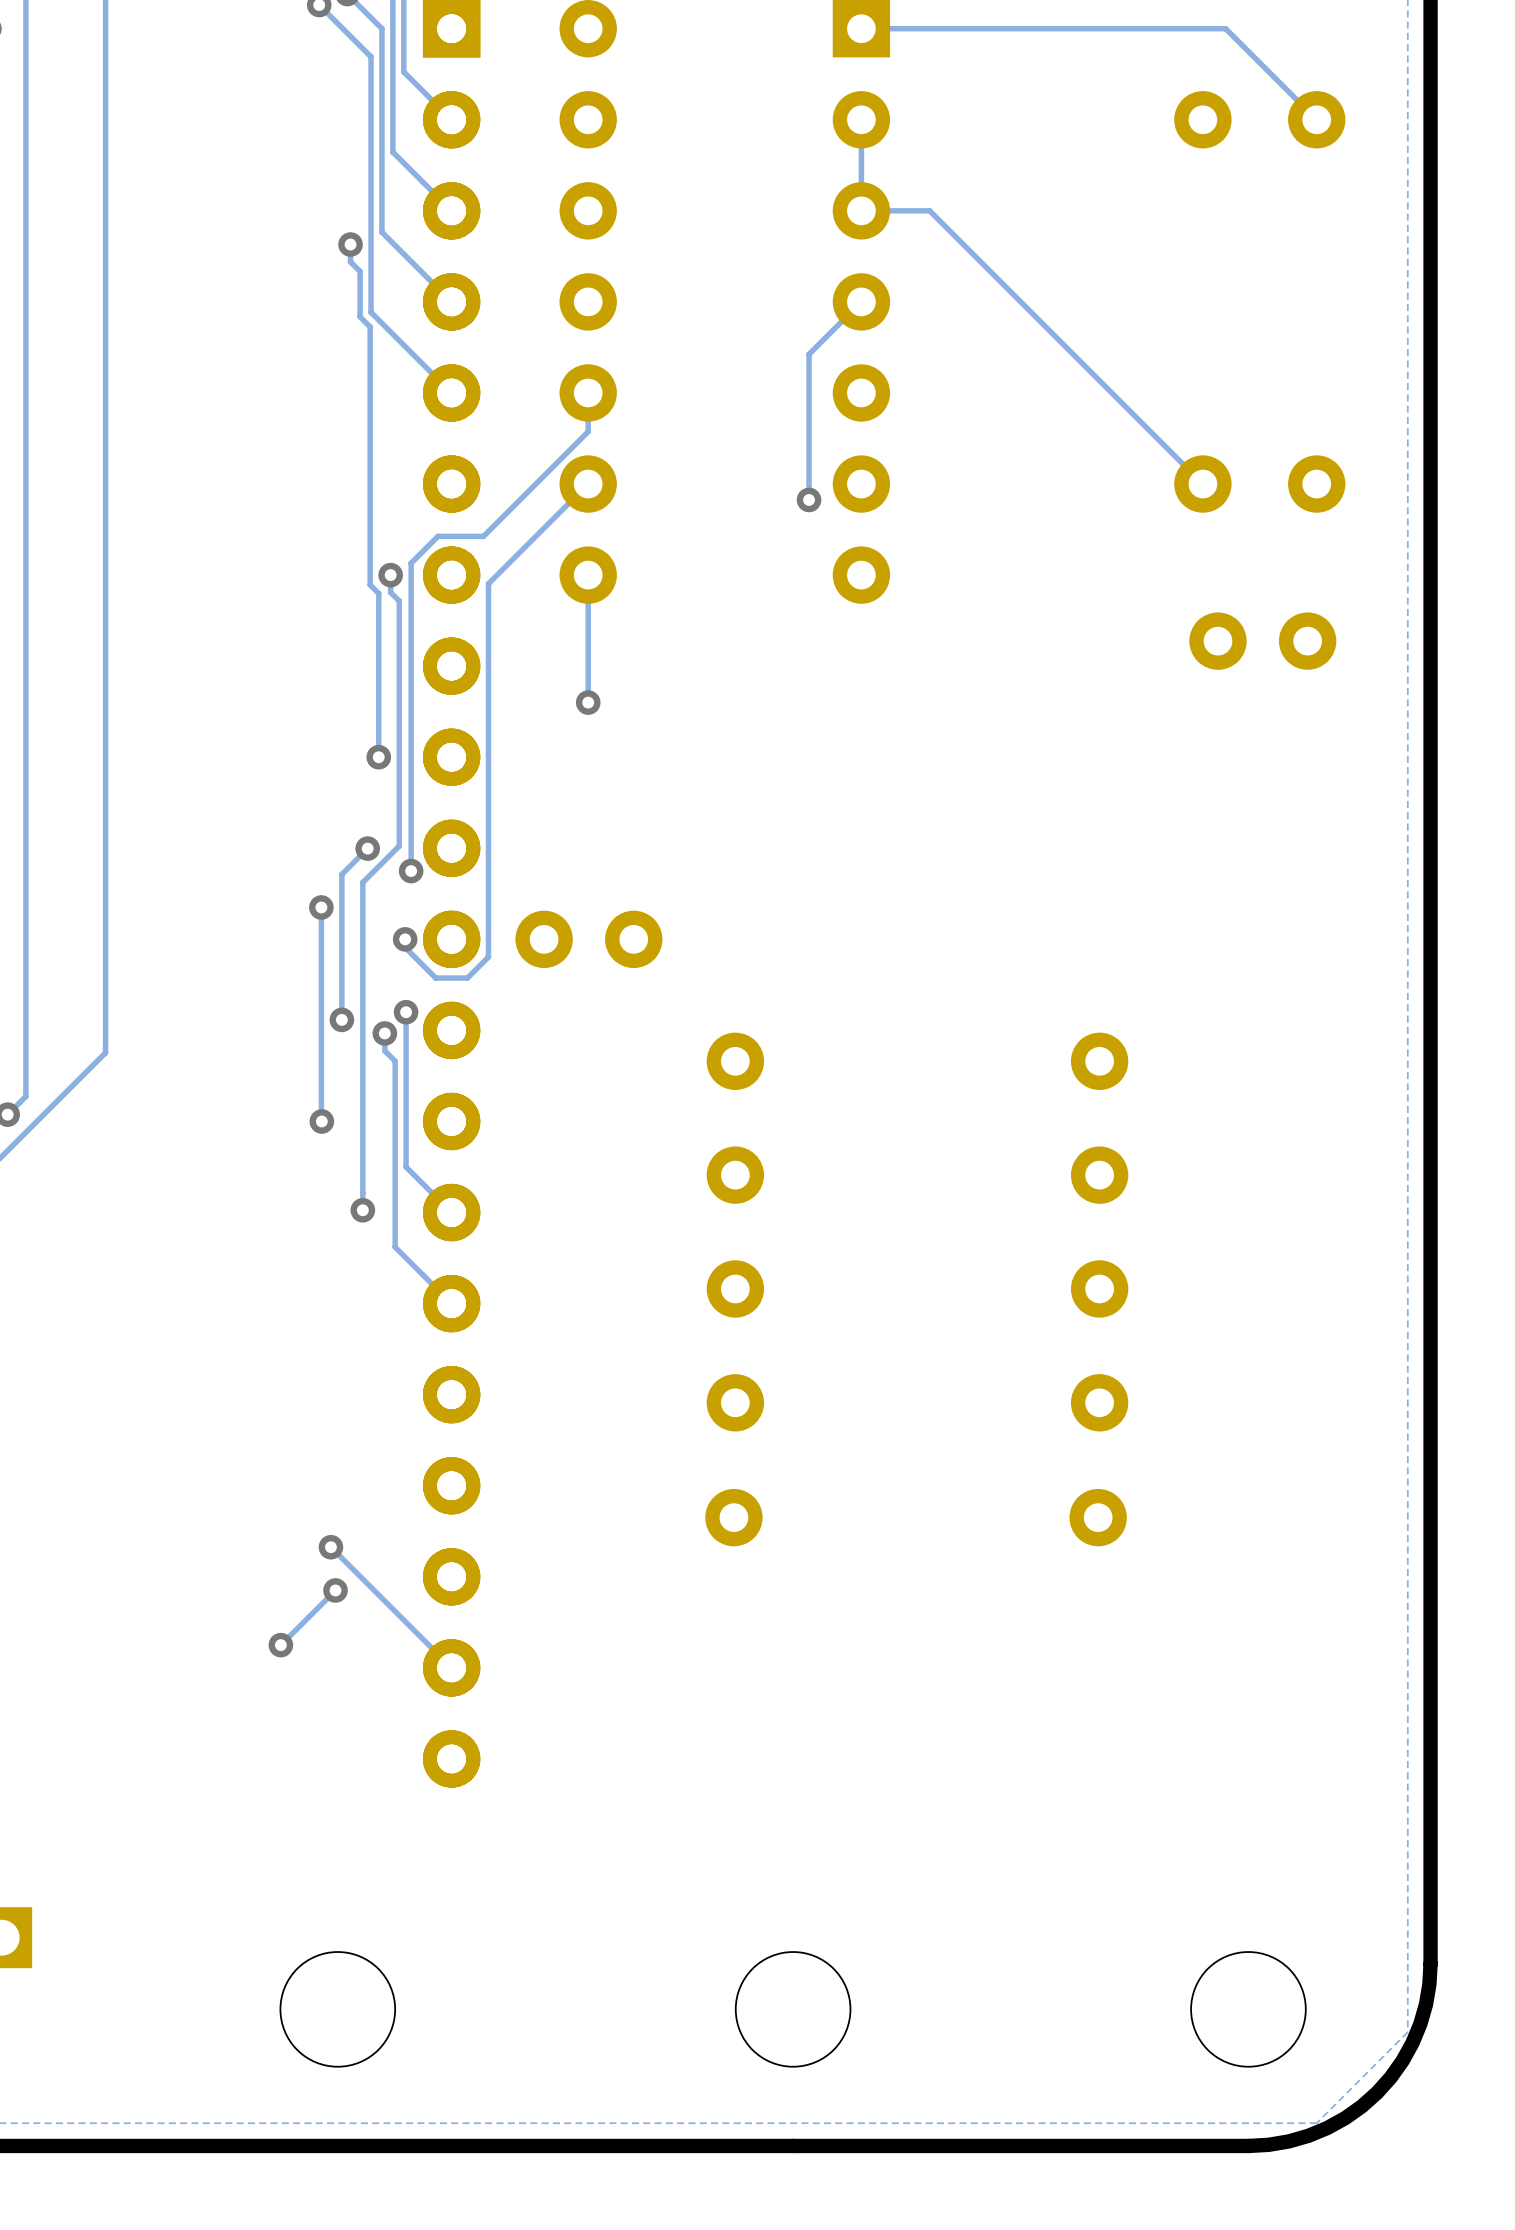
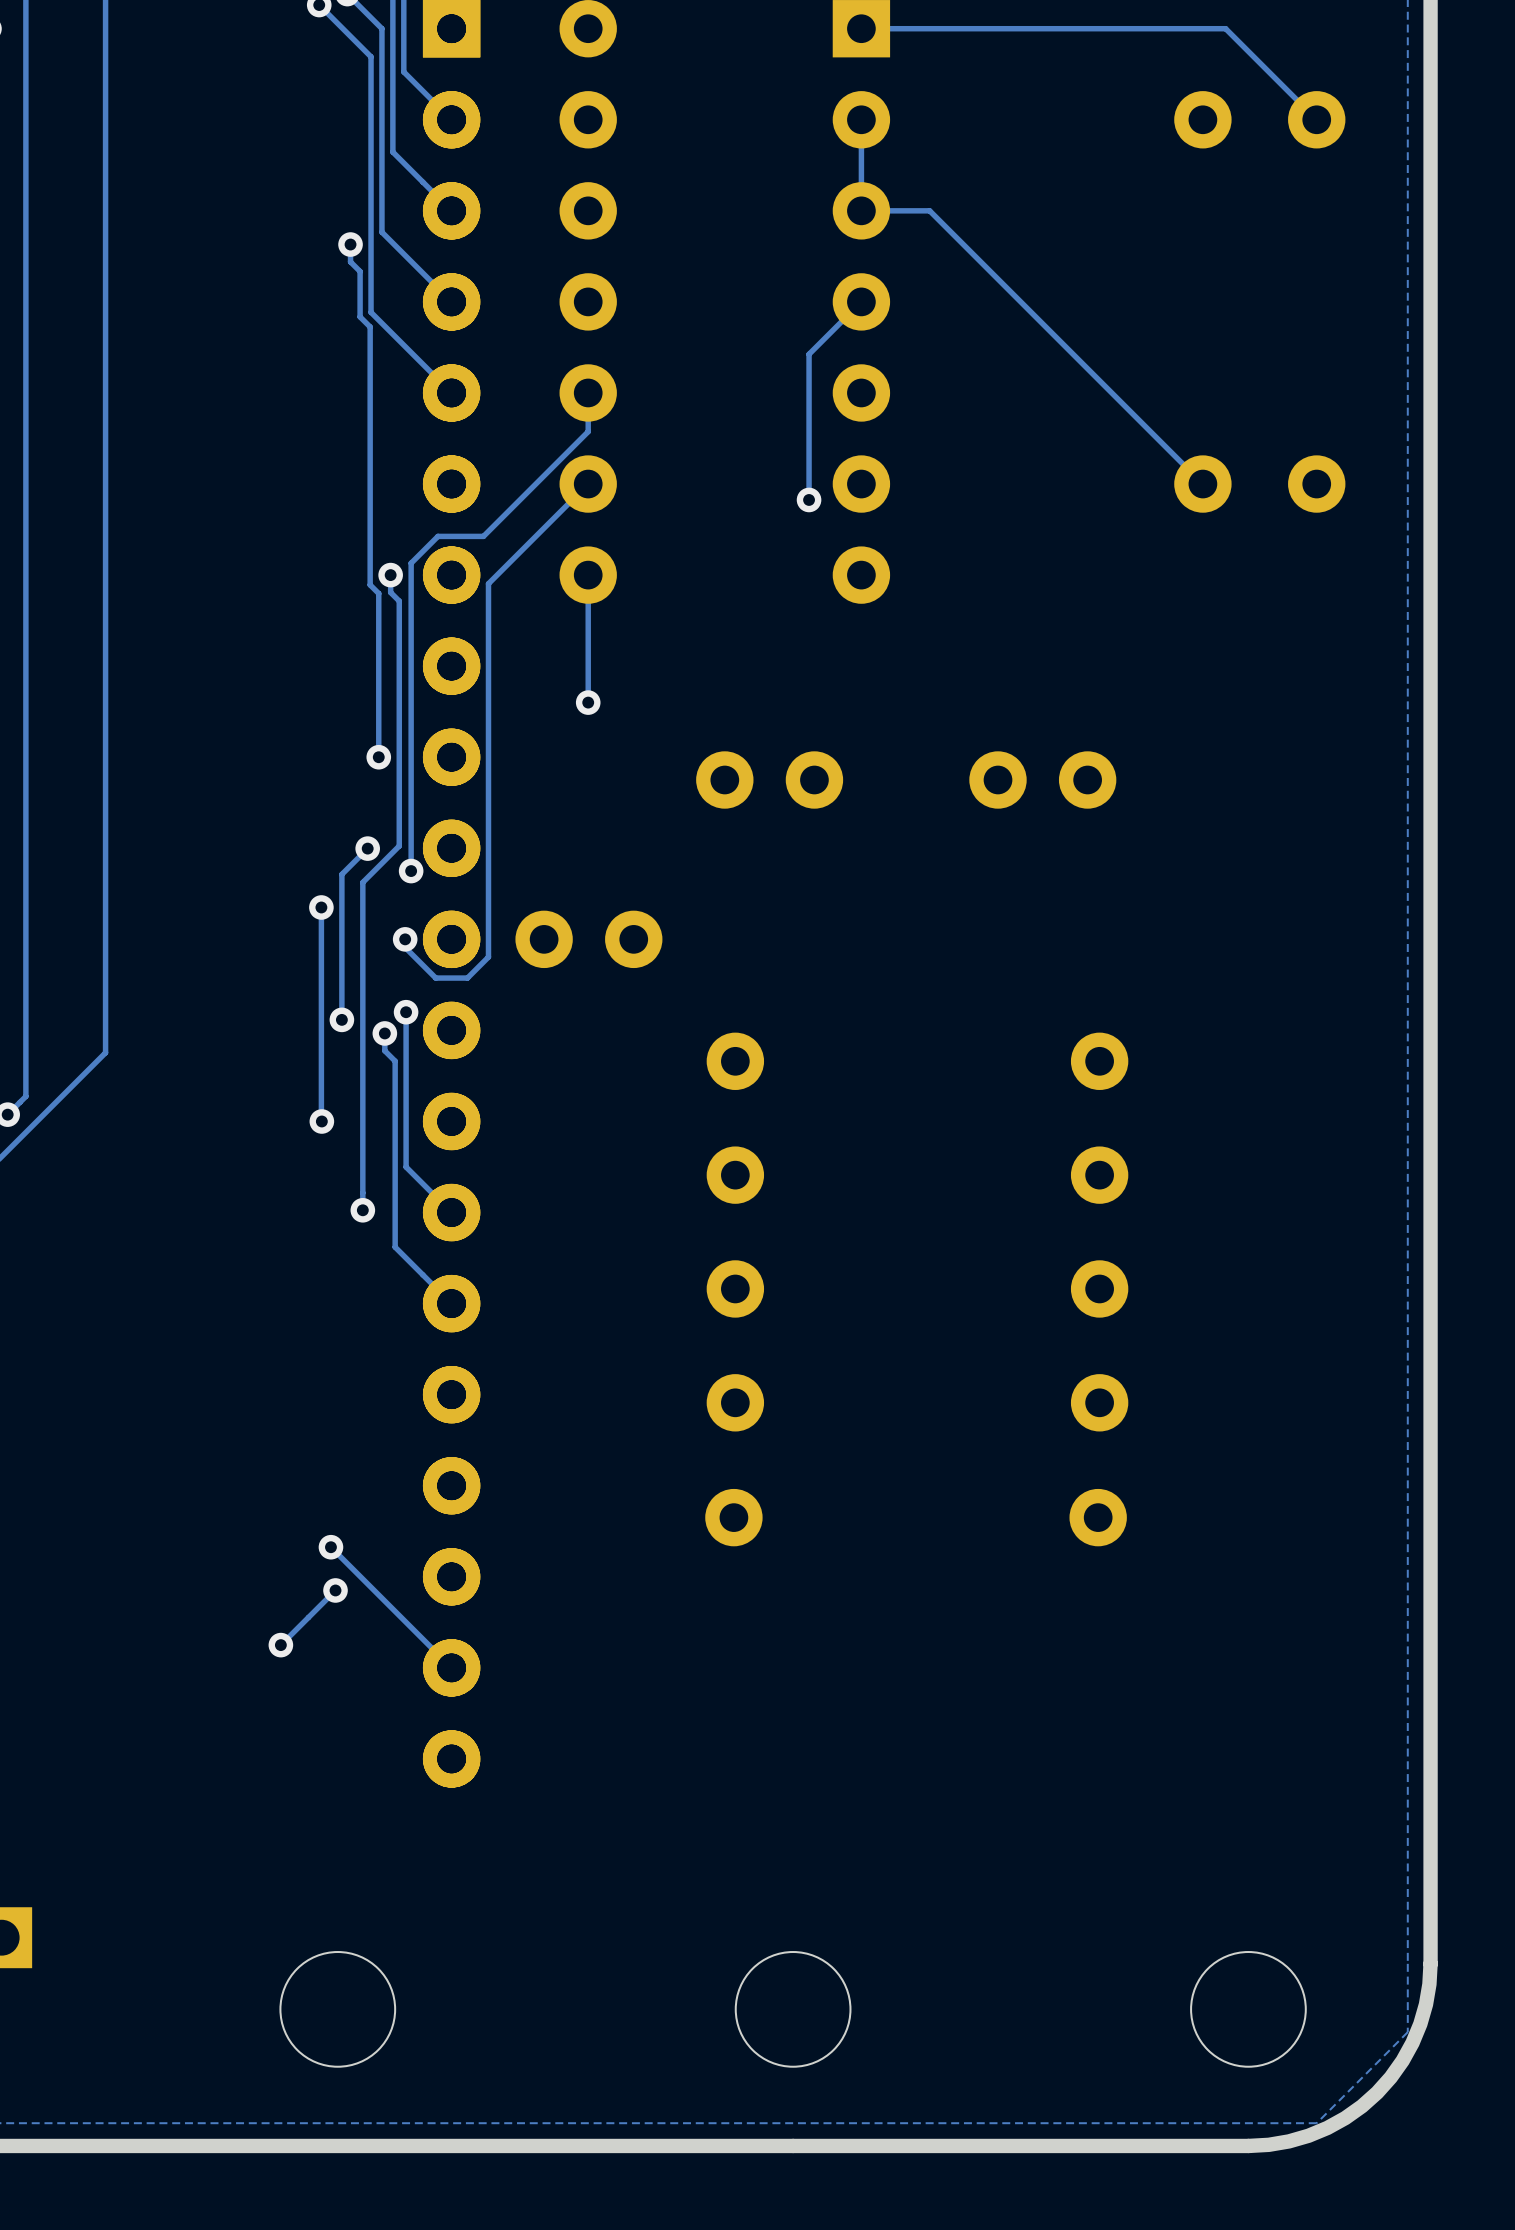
part: (1262, 641) -> none
part: none -> (769, 779)
part: none -> (1042, 779)

